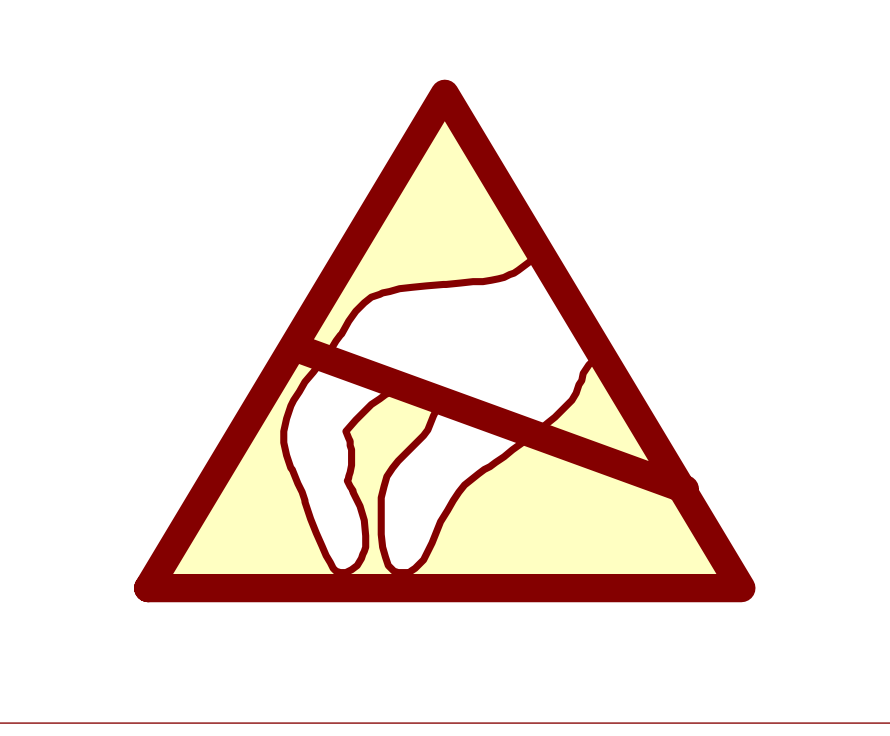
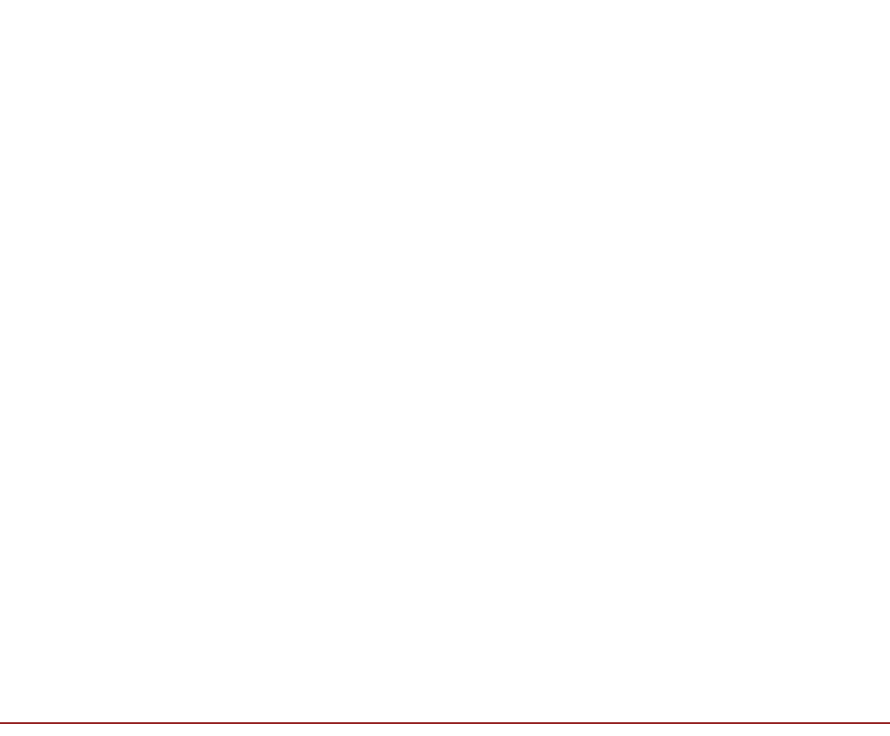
power symbol: (444, 340) -> none

